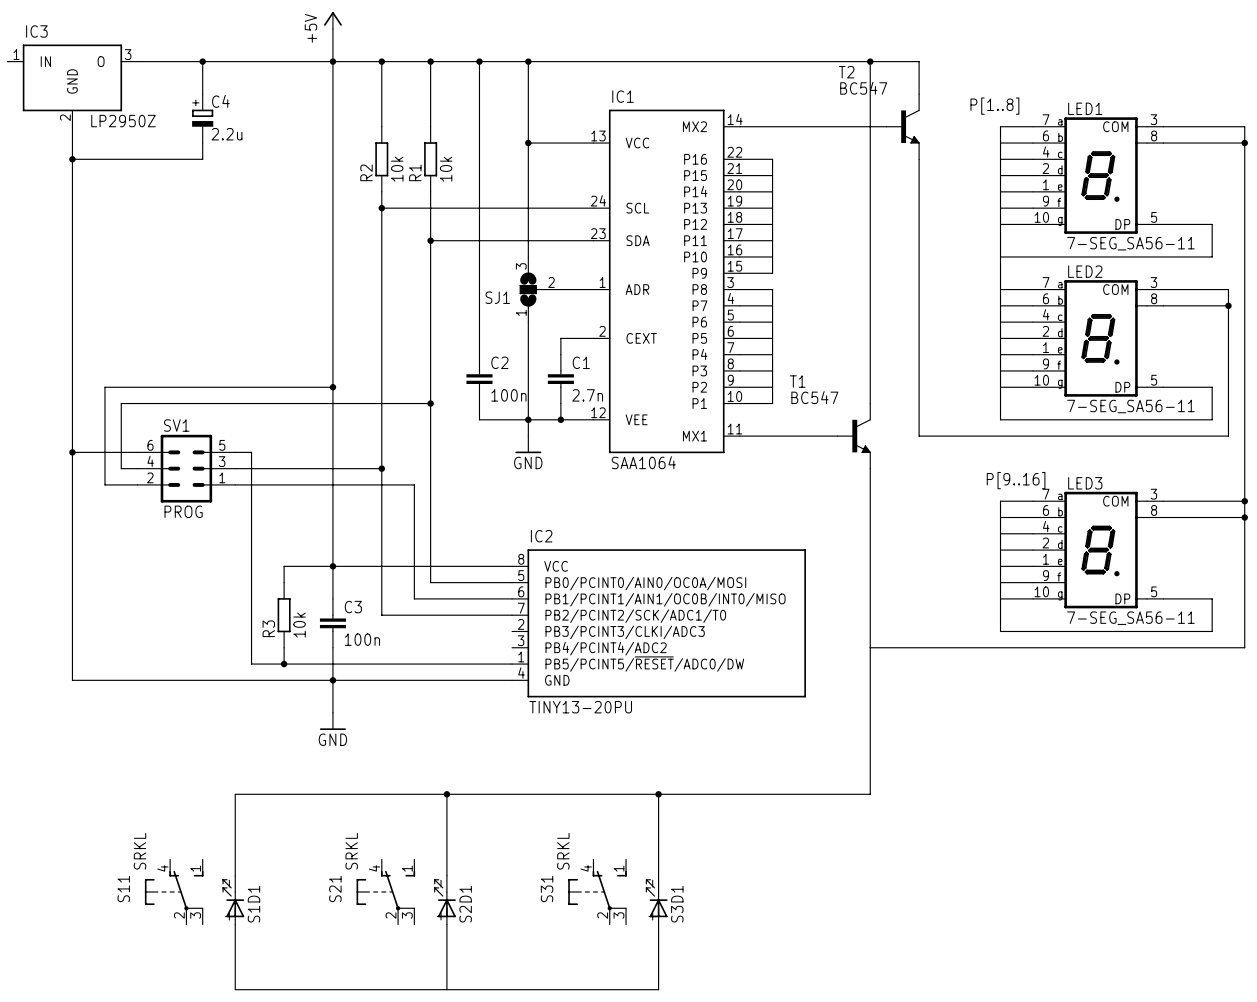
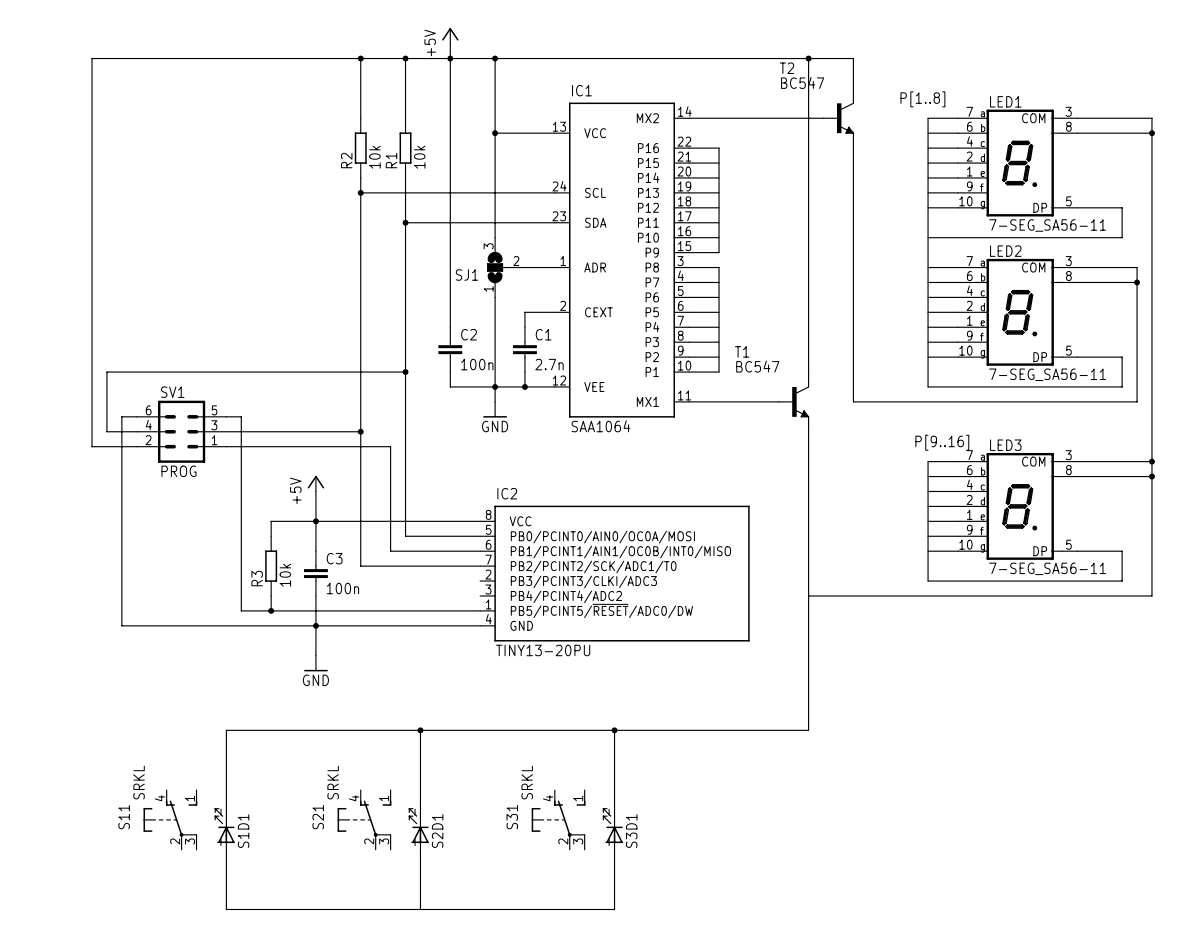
power symbol position: +5V (332, 20) -> +5V (450, 35)
wire: (332, 29) (332, 533) -> none
wire: none -> (450, 43) (450, 58)
wire: none -> (136, 58) (92, 58) (92, 446) (106, 446)
wire: (202, 61) (202, 94) -> none
junction: (202, 61) -> none
junction: (332, 61) -> none
IC3: LP2950Z (72, 85) -> none
C4: 2.2u (202, 118) -> none
wire: (72, 126) (72, 680) (121, 680) -> none
wire: (202, 143) (202, 159) (72, 159) -> none
junction: (72, 159) -> none
wire: (332, 387) (105, 387) (105, 403) -> none
junction: (332, 387) -> none
wire: (121, 403) (121, 452) (72, 452) -> (121, 372) (106, 372)
junction: (72, 452) -> none
wire: (105, 468) (105, 484) -> (106, 431) (121, 431) (121, 625)
power symbol: none -> +5V (315, 483)

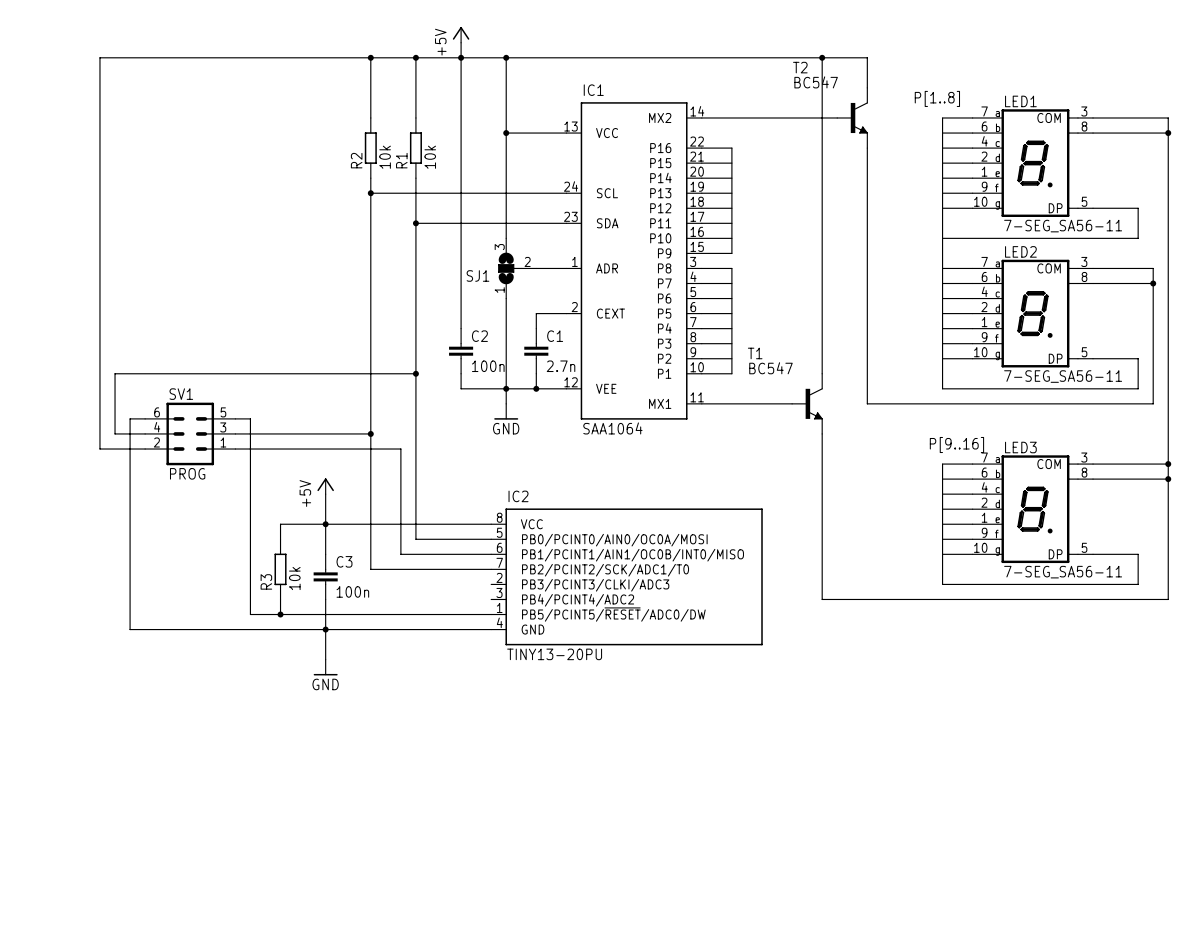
wire: (808, 595) (808, 730) (226, 730) (226, 804) -> none
wire: (420, 730) (420, 804) -> none
junction: (420, 730) -> none
wire: (614, 730) (614, 804) -> none
junction: (614, 730) -> none
S11: SRKL (170, 819) -> none
S21: SRKL (364, 819) -> none
S31: SRKL (558, 819) -> none
S1D1: (224, 827) -> none
S2D1: (418, 827) -> none
S3D1: (612, 827) -> none
wire: (226, 849) (226, 909) -> none
wire: (420, 849) (420, 909) -> none
wire: (614, 849) (614, 909) -> none
bus: (226, 909) (614, 909) -> none

